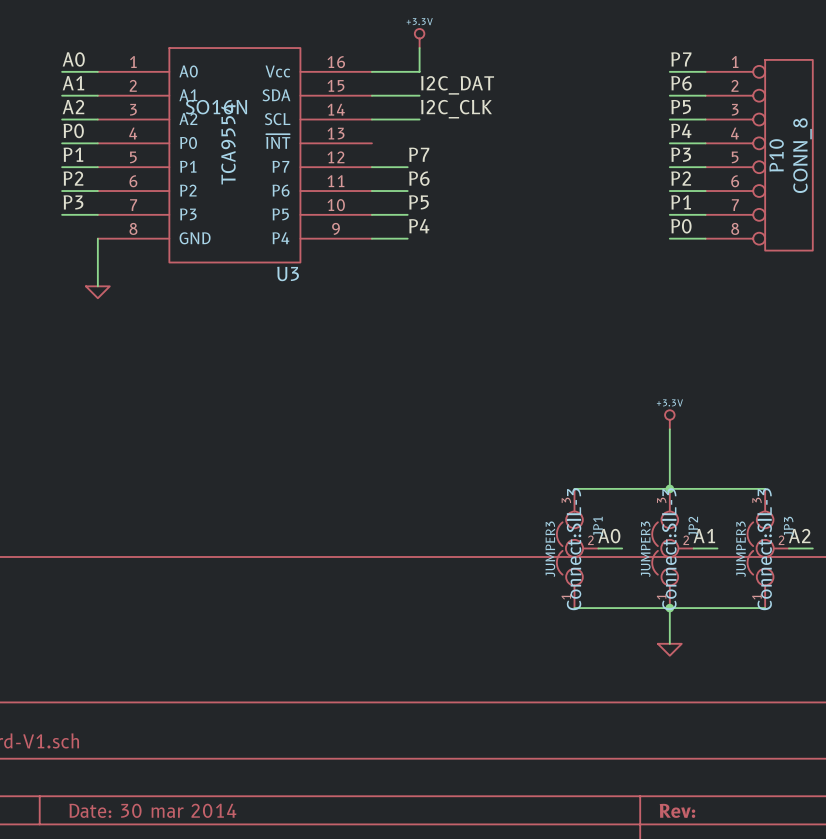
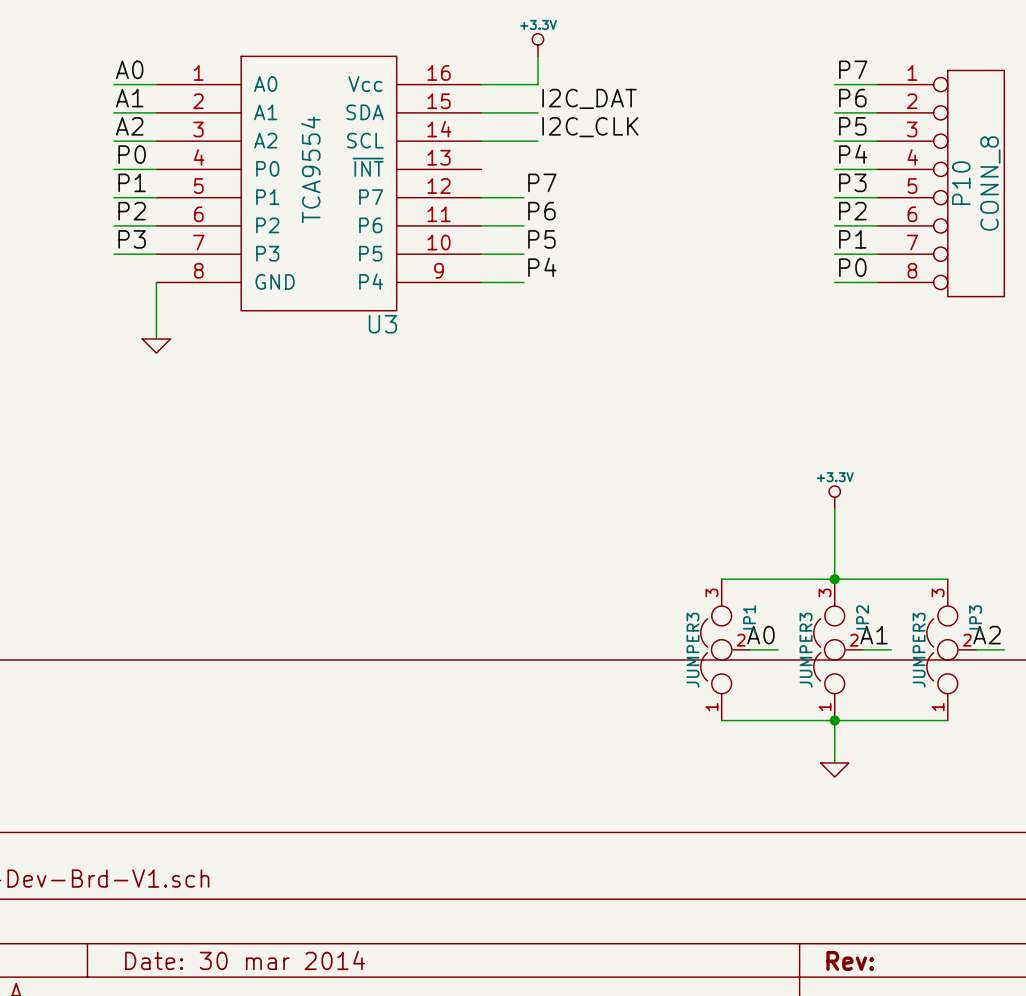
U3 text: SO16N (216, 107) -> none
JP1 text: Connect:SIL-3 (574, 549) -> none
JP2 text: Connect:SIL-3 (669, 549) -> none
JP3 text: Connect:SIL-3 (764, 549) -> none

